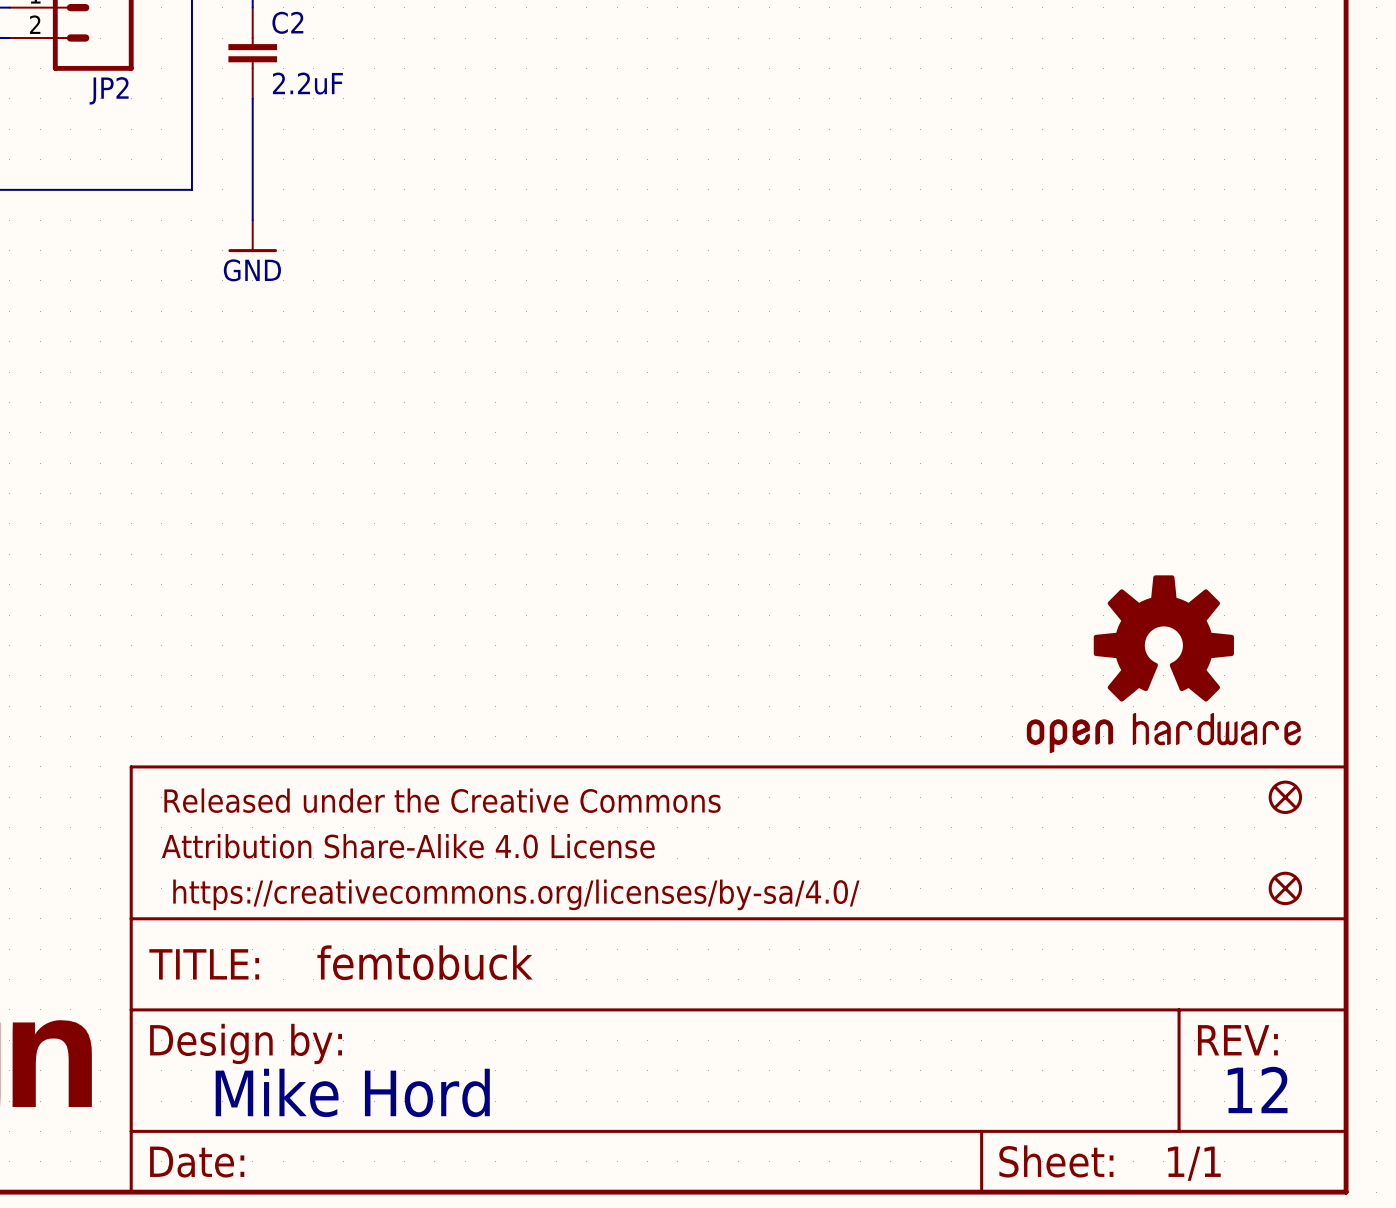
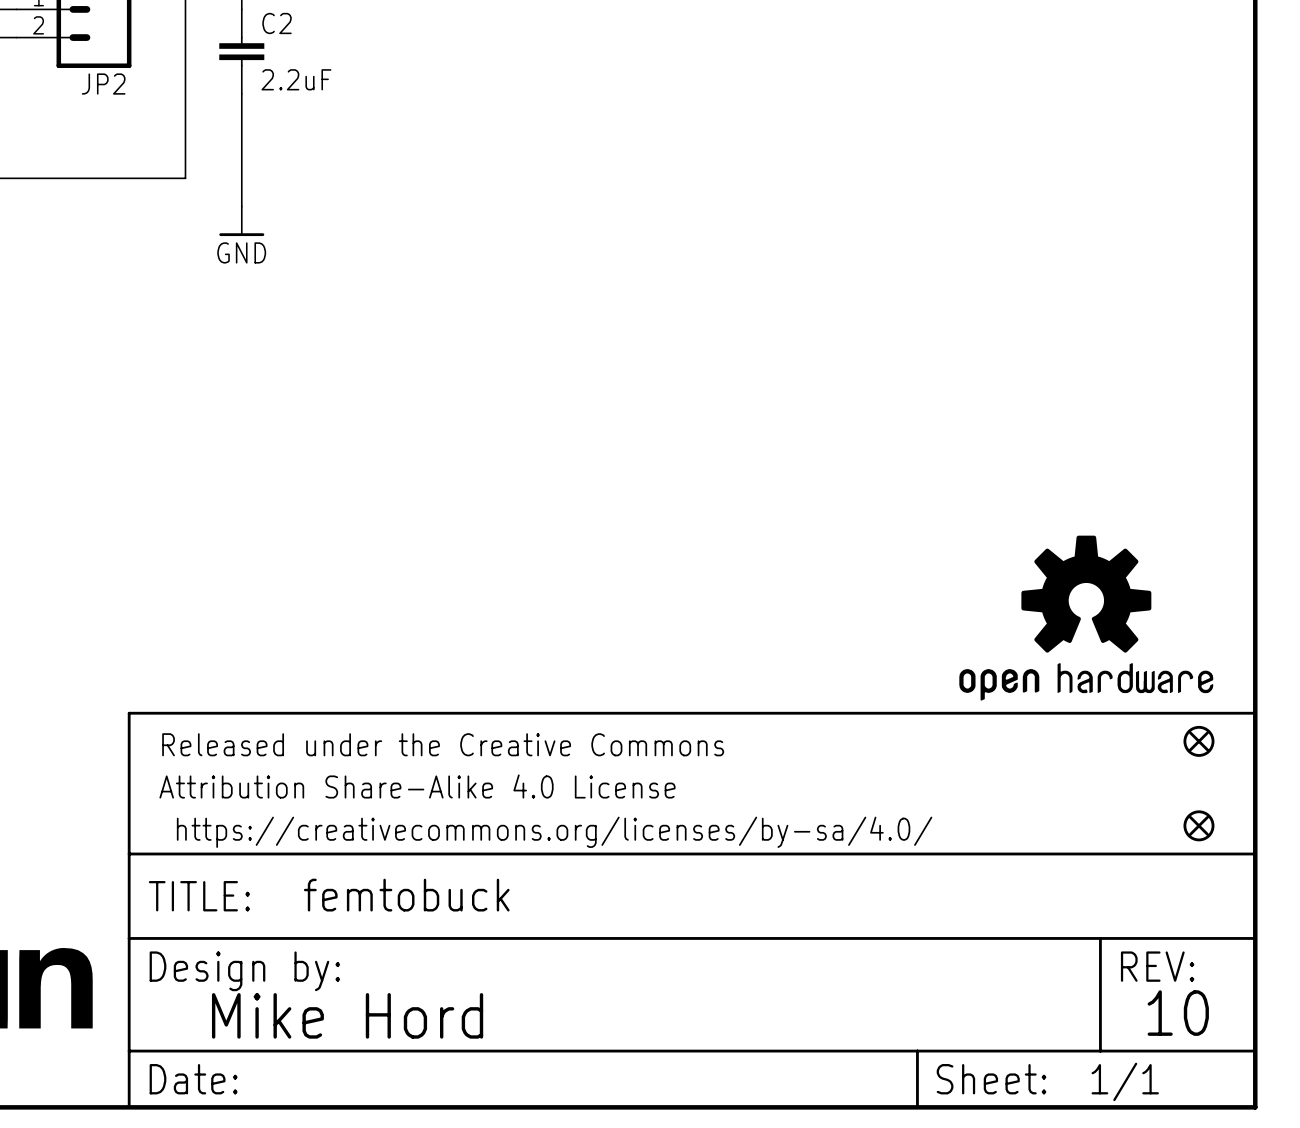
text: 12 (1257, 1089) -> 10 (1178, 1013)

